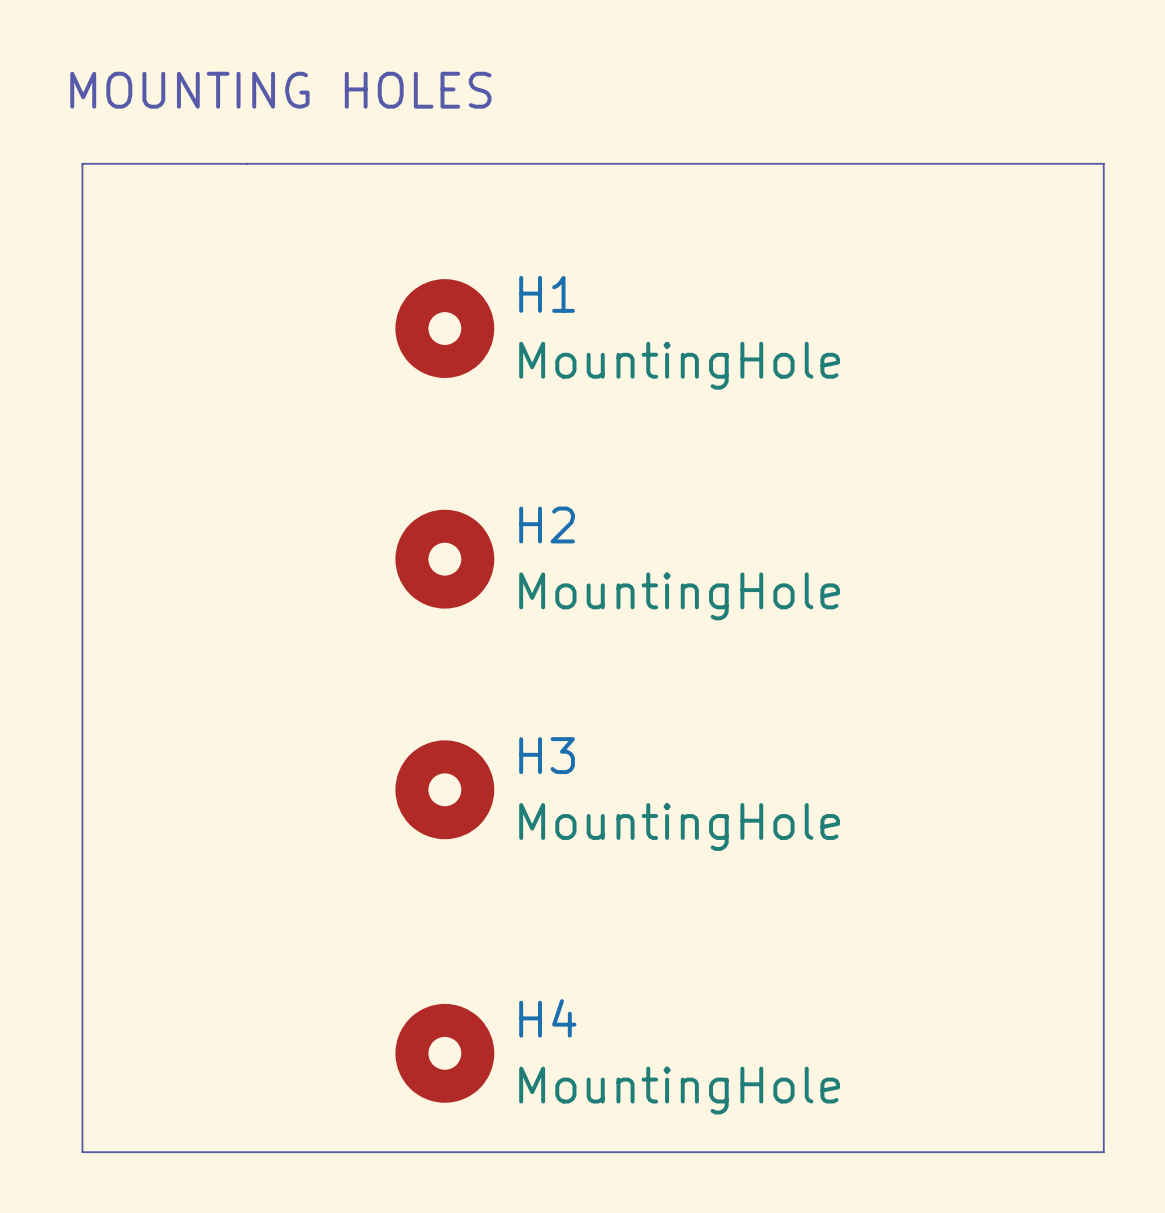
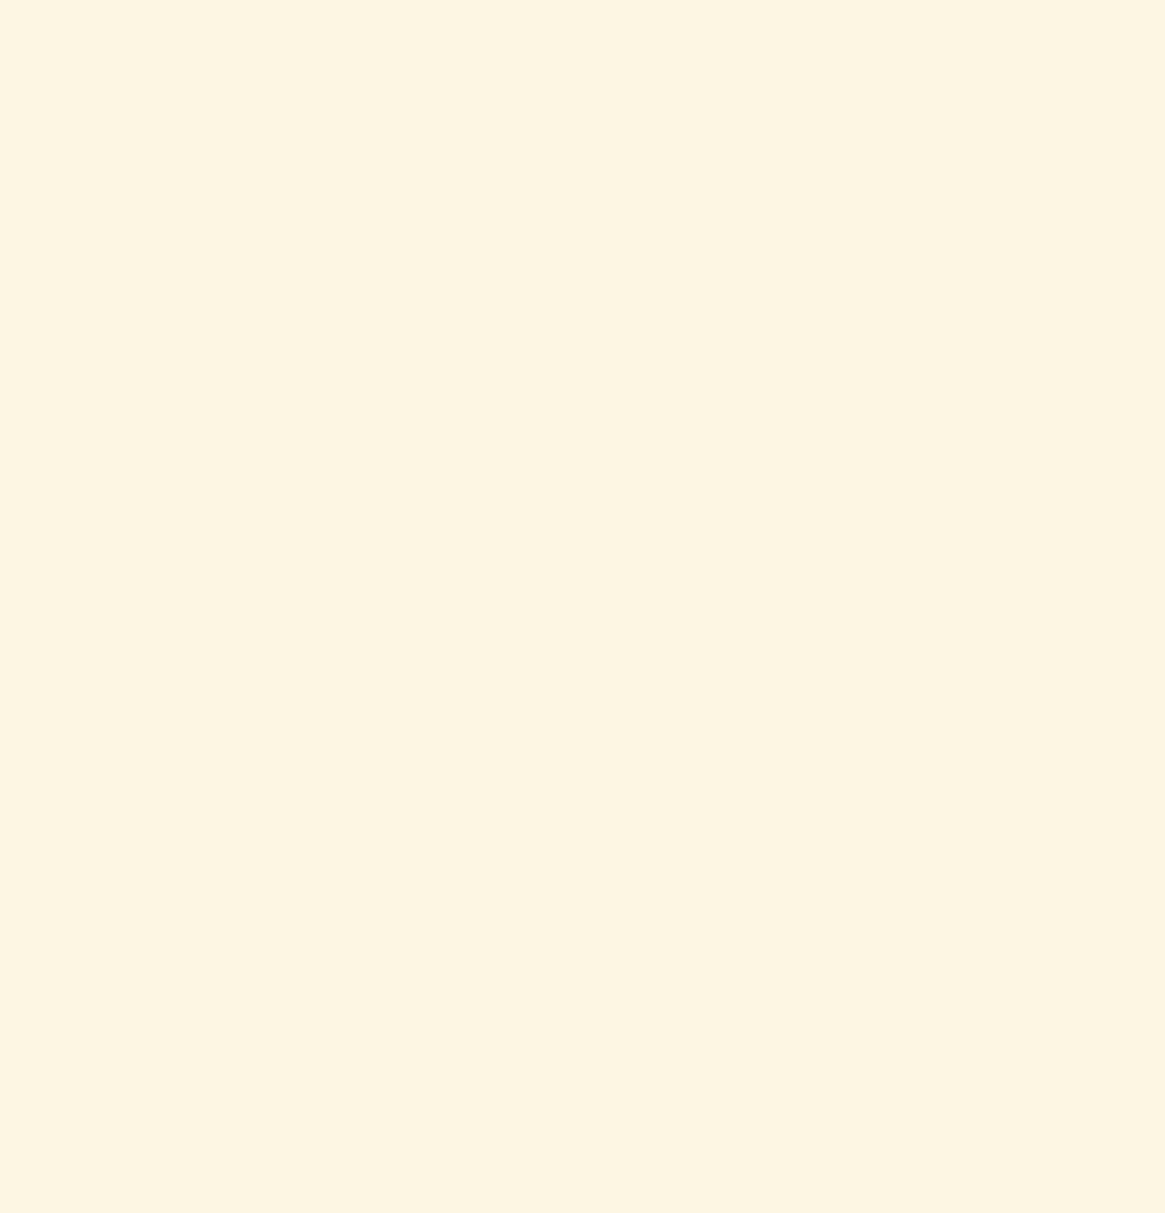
text: MOUNTING HOLES (280, 90) -> none
line: (82, 163) (1103, 163) (1103, 1152) (82, 1152) (82, 163) -> none
H1: MountingHole (444, 328) -> none
H2: MountingHole (444, 559) -> none
H3: MountingHole (444, 789) -> none
H4: MountingHole (444, 1053) -> none

